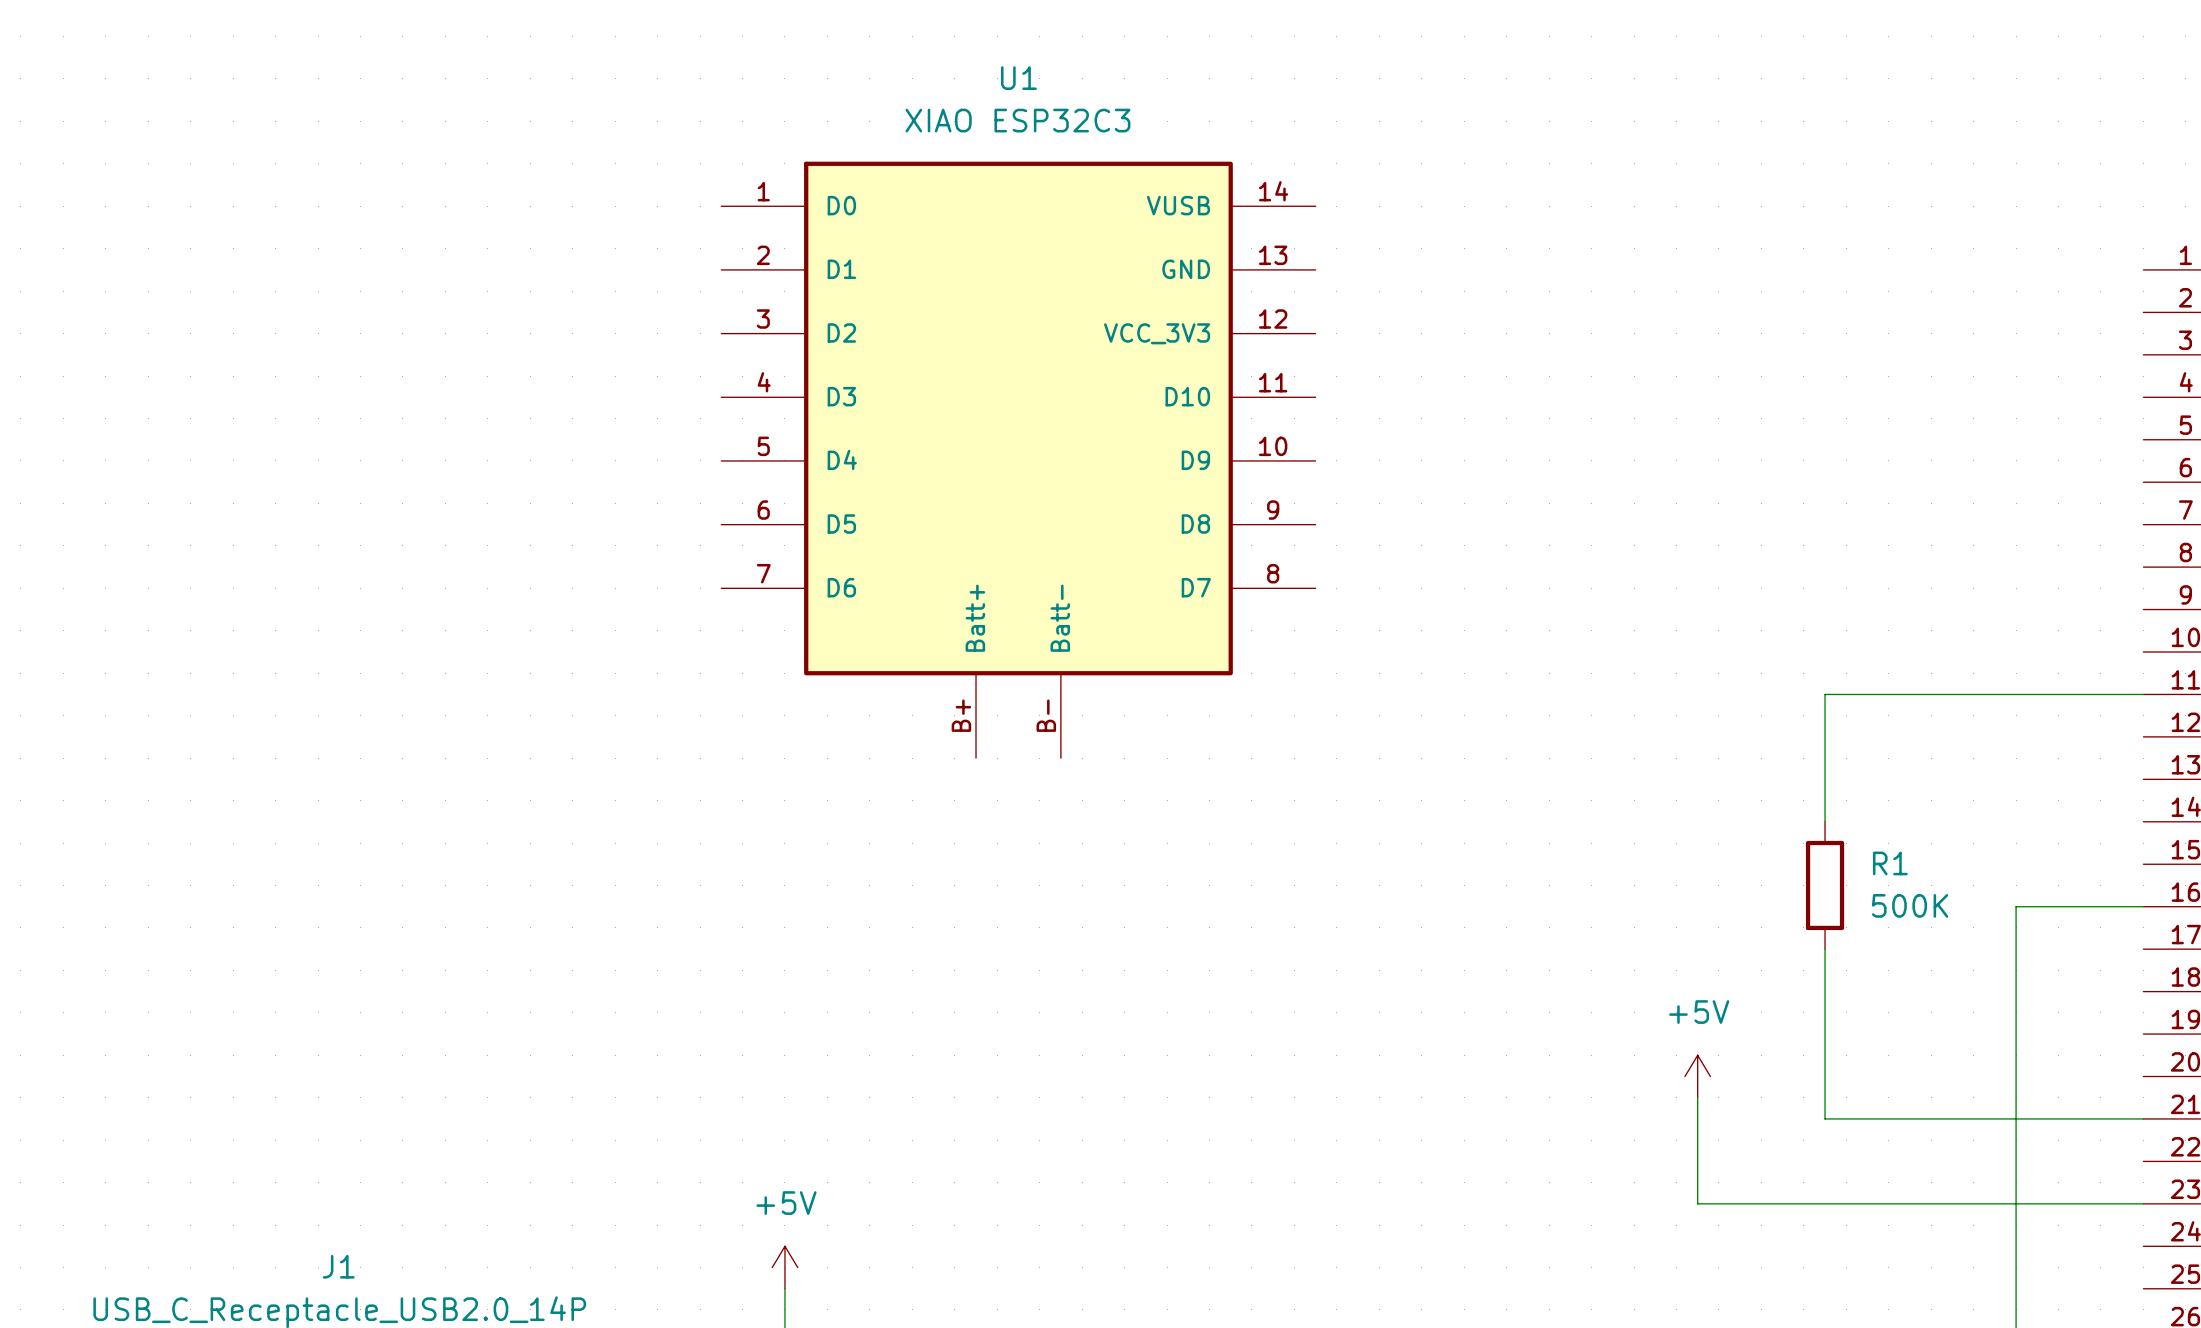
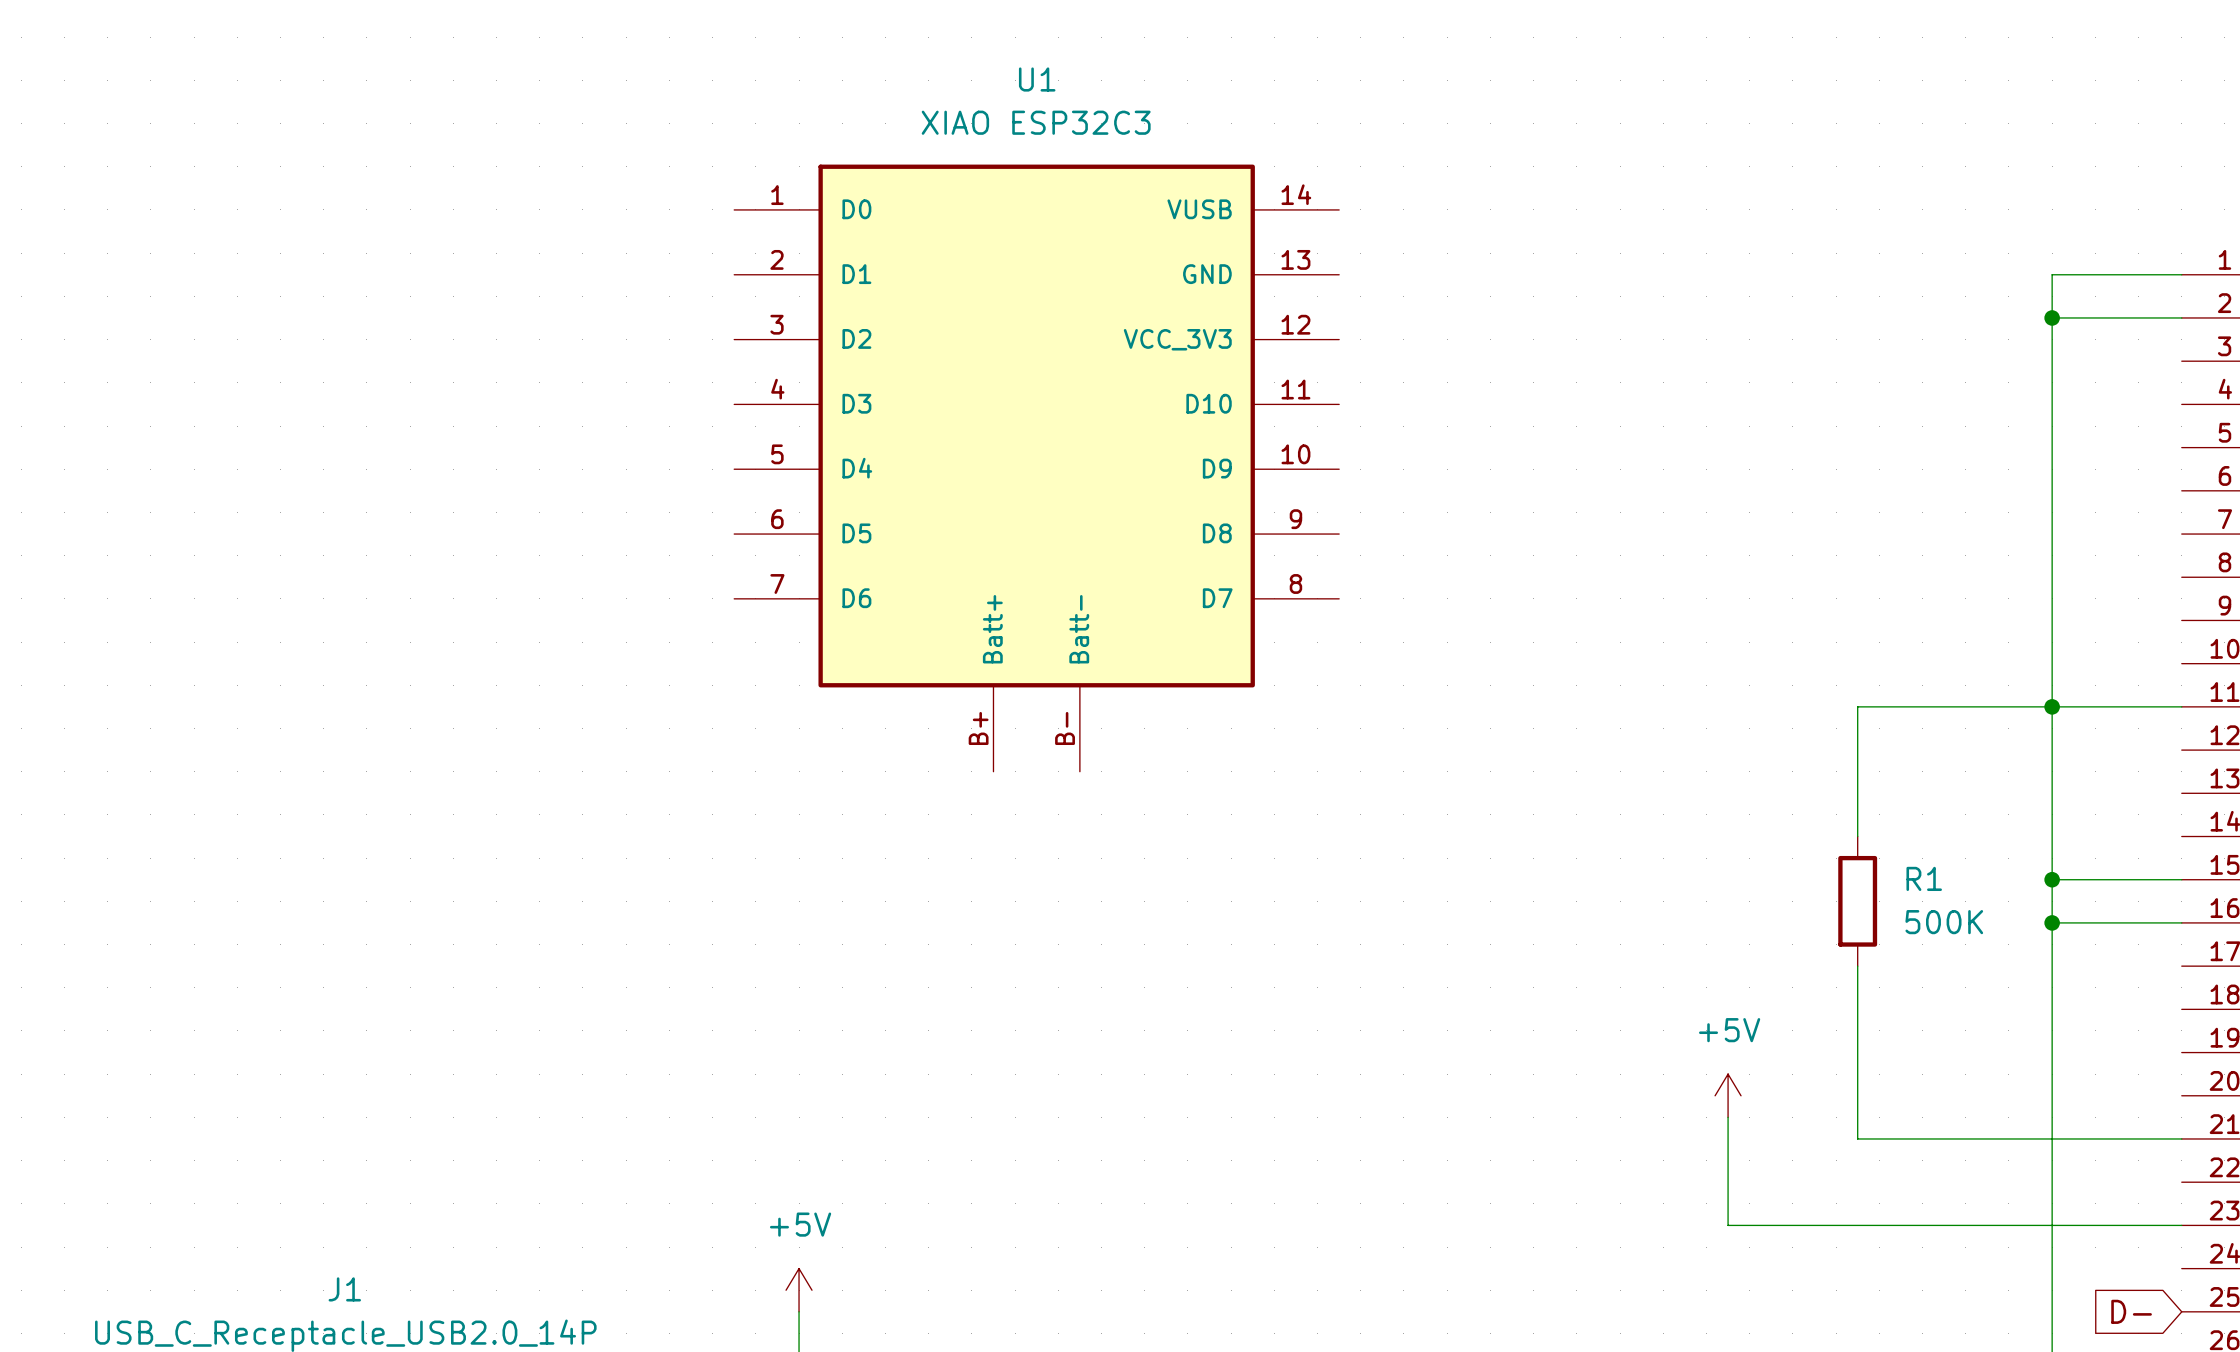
wire: none -> (2181, 274) (2052, 274) (2052, 922)
wire: none -> (2052, 317) (2181, 317)
junction: none -> (2052, 317)
junction: none -> (2052, 706)
wire: none -> (2052, 879) (2181, 879)
junction: none -> (2052, 879)
junction: none -> (2052, 922)
global label: none -> D- (2131, 1311)

